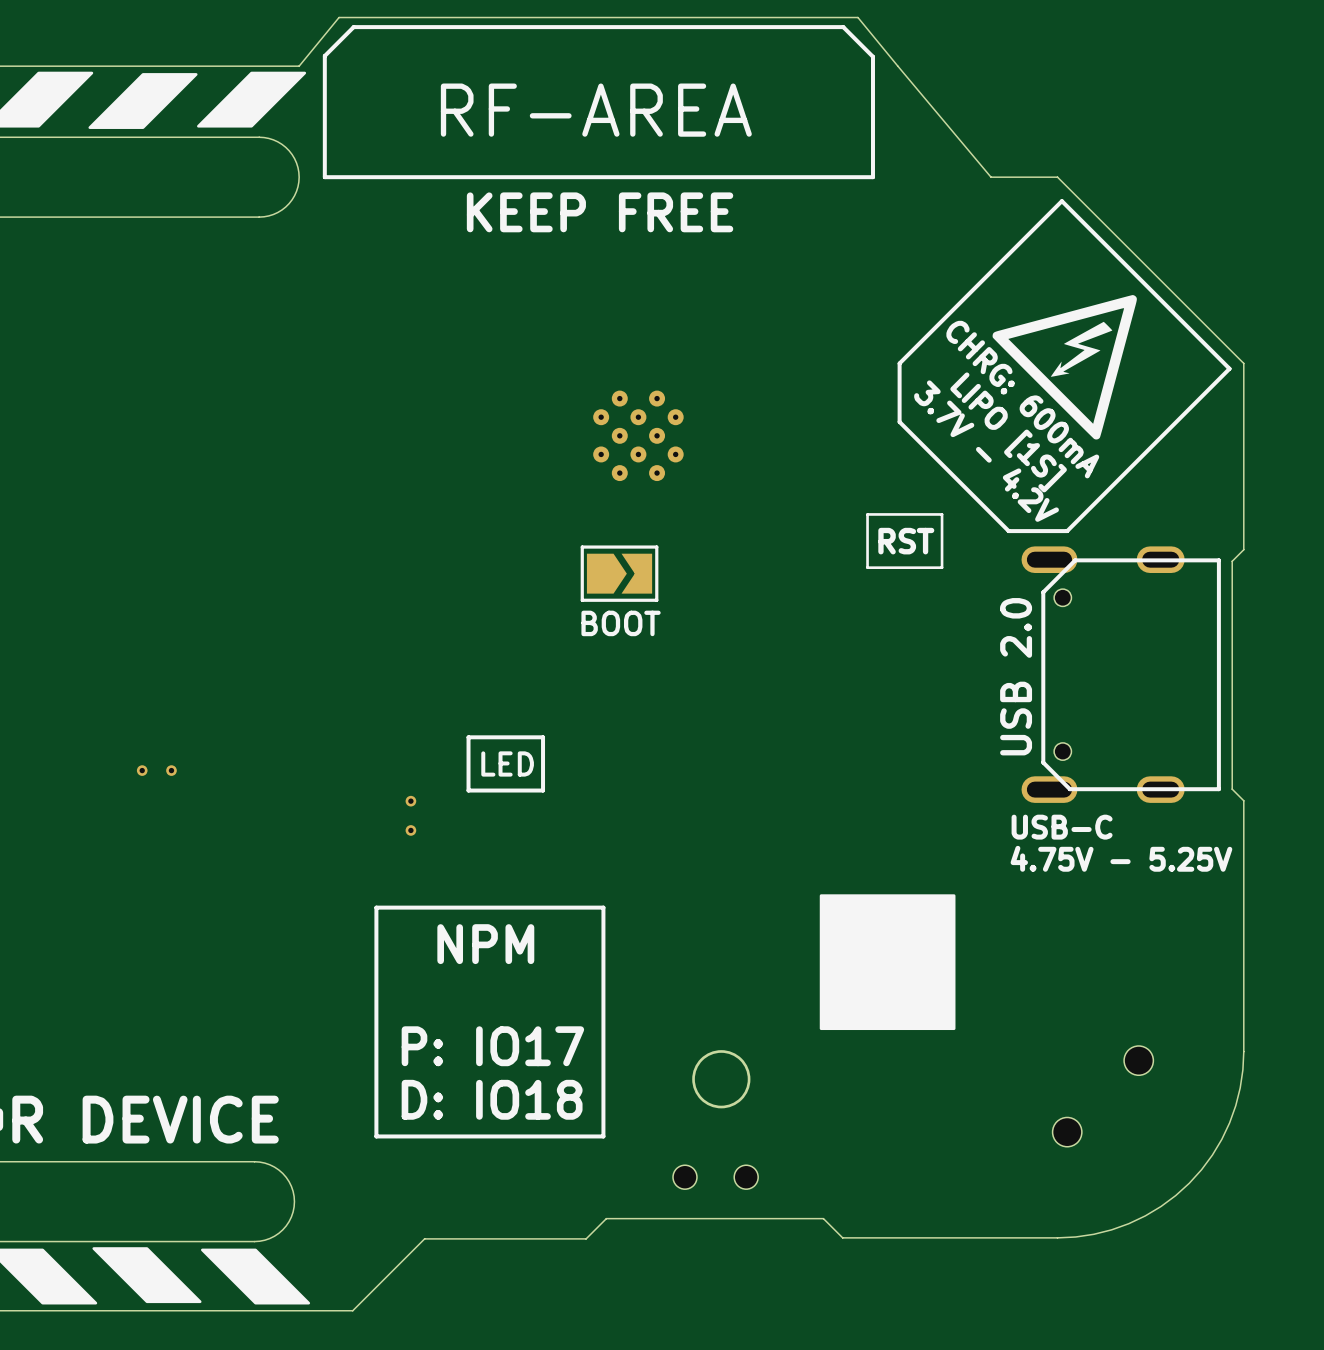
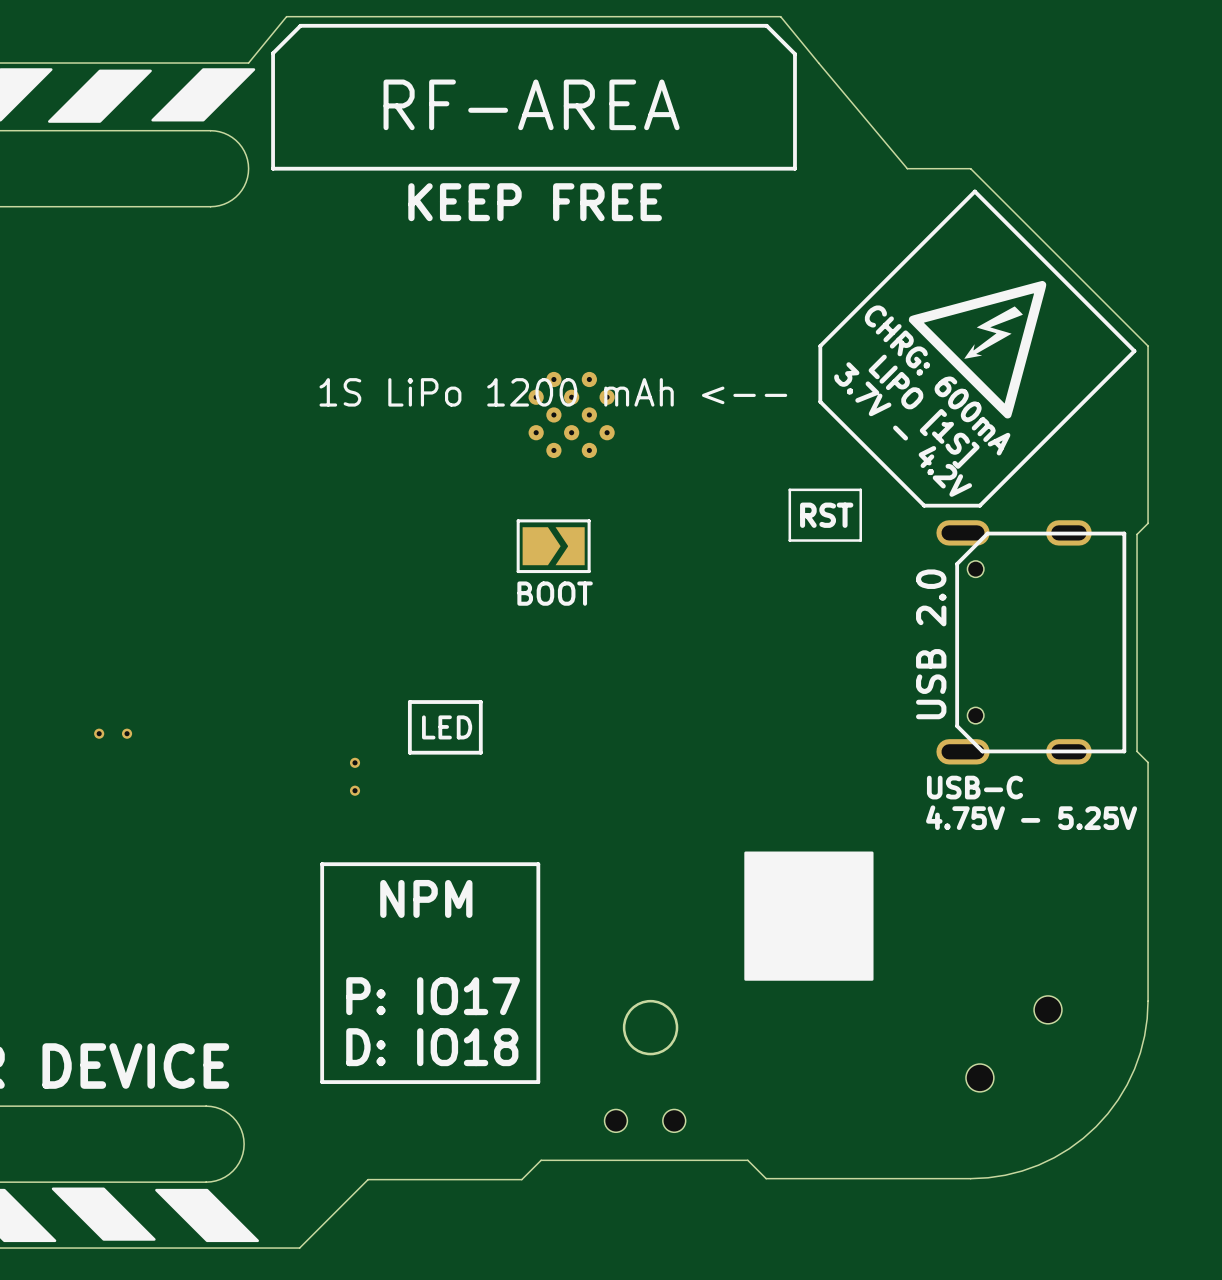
text: none -> 1S LiPo 1200 mAh <-- (553, 392)

